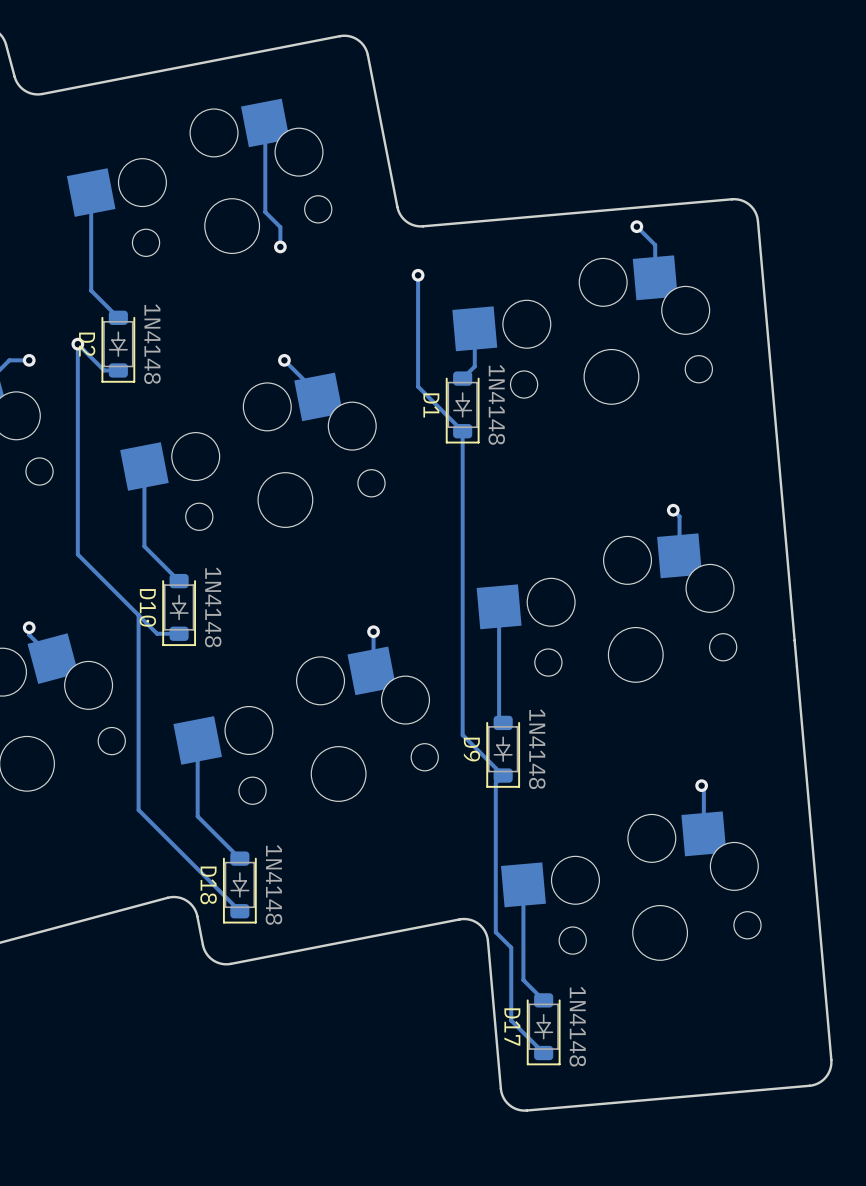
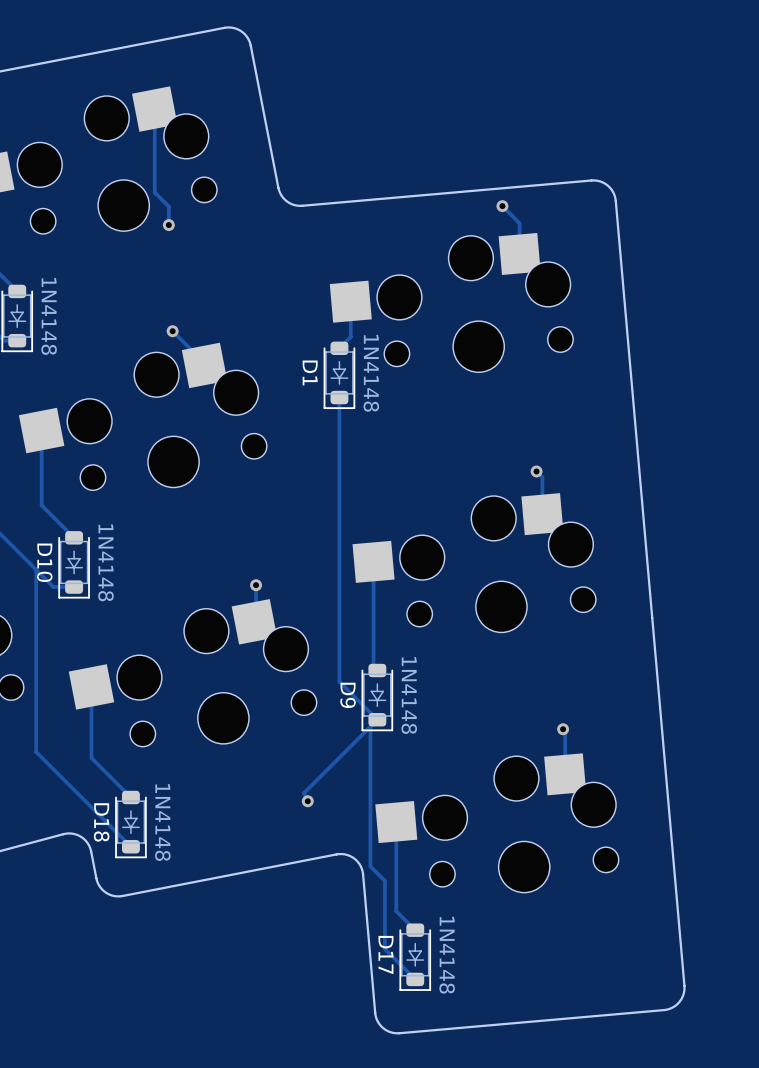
track: (418, 275) (418, 386) (462, 431) -> none
via: (418, 275) -> none
track: none -> (370, 726) (304, 793) (307, 801)
via: none -> (307, 801)

